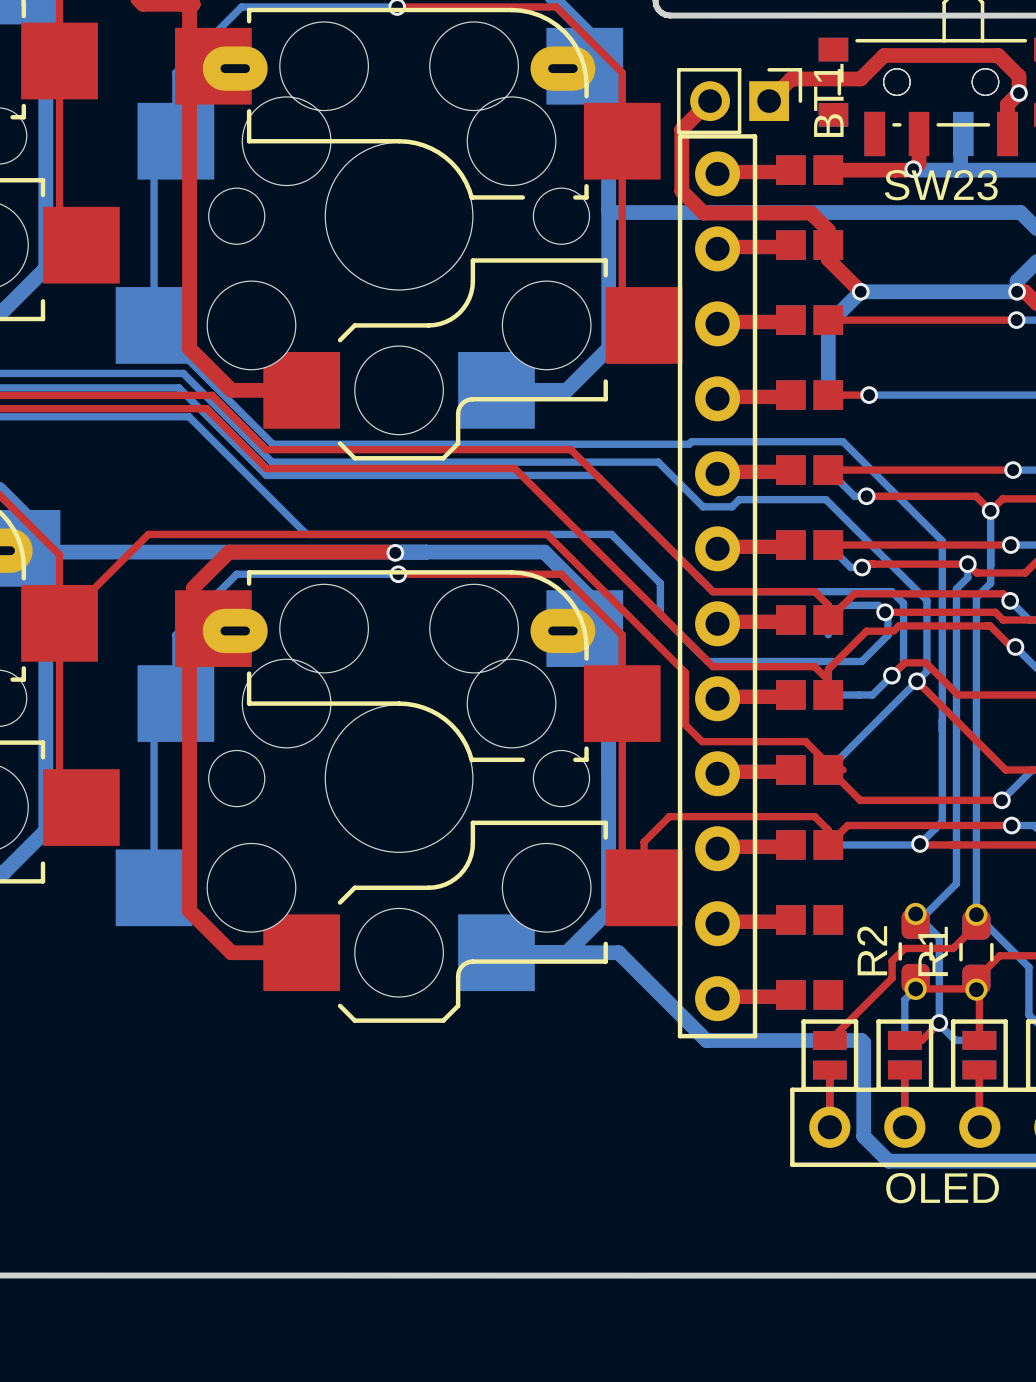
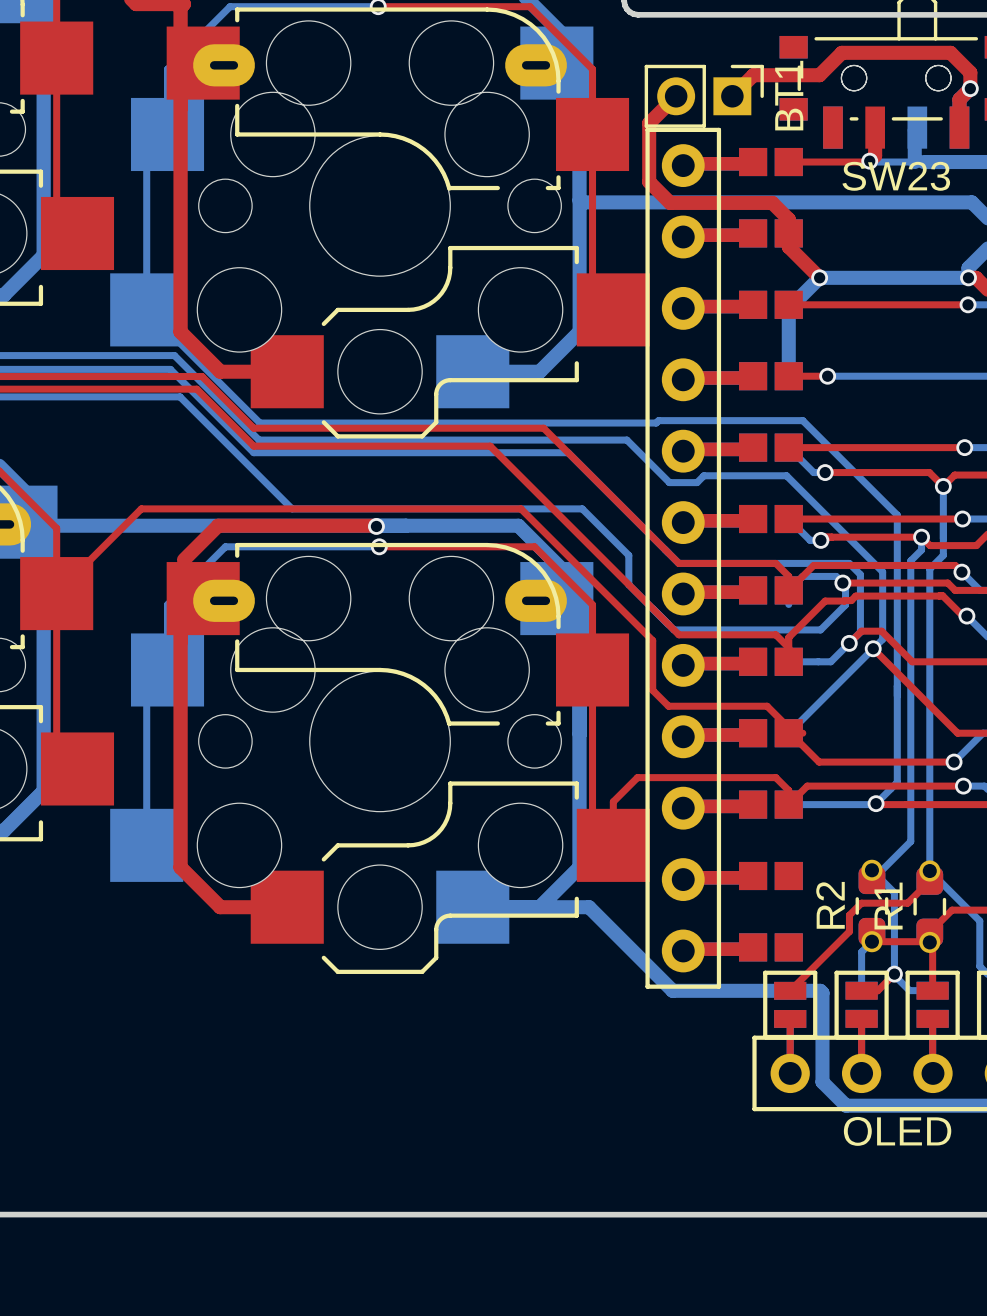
top track width: thick (828, 170) (912, 170) -> thin (788, 162) (868, 162)
bottom track width: thick (914, 170) (969, 170) -> thin (870, 162) (923, 162)

